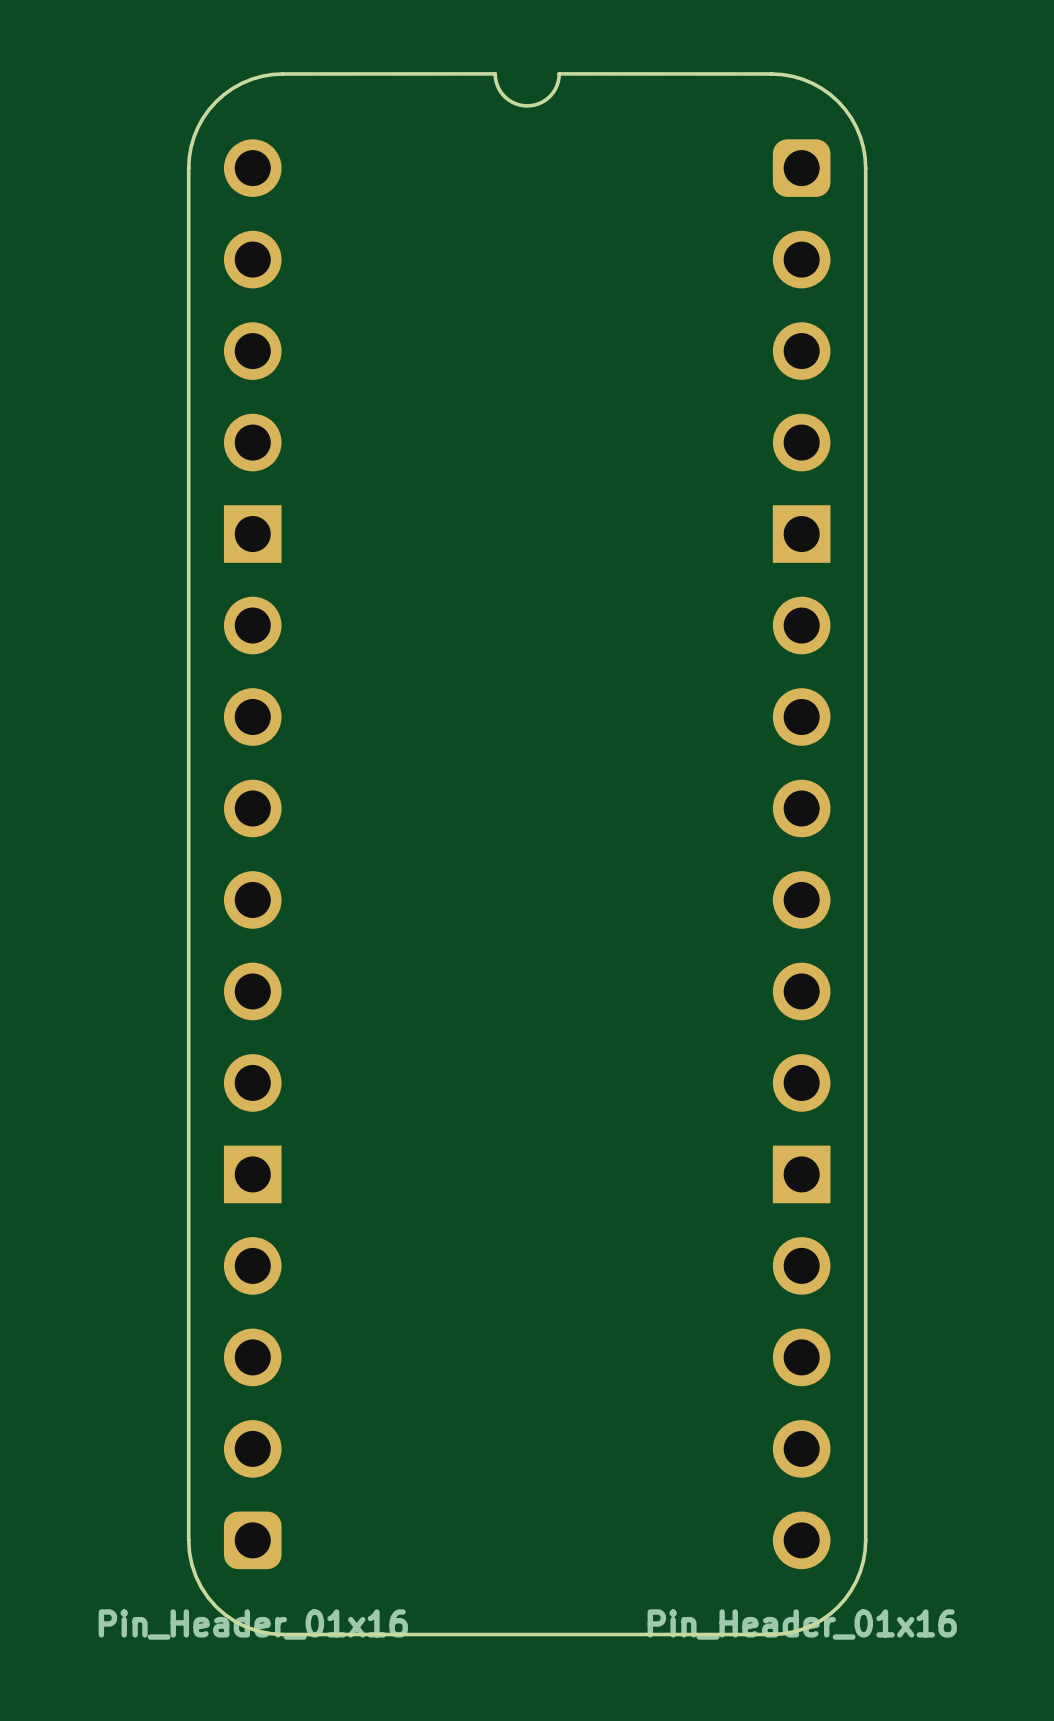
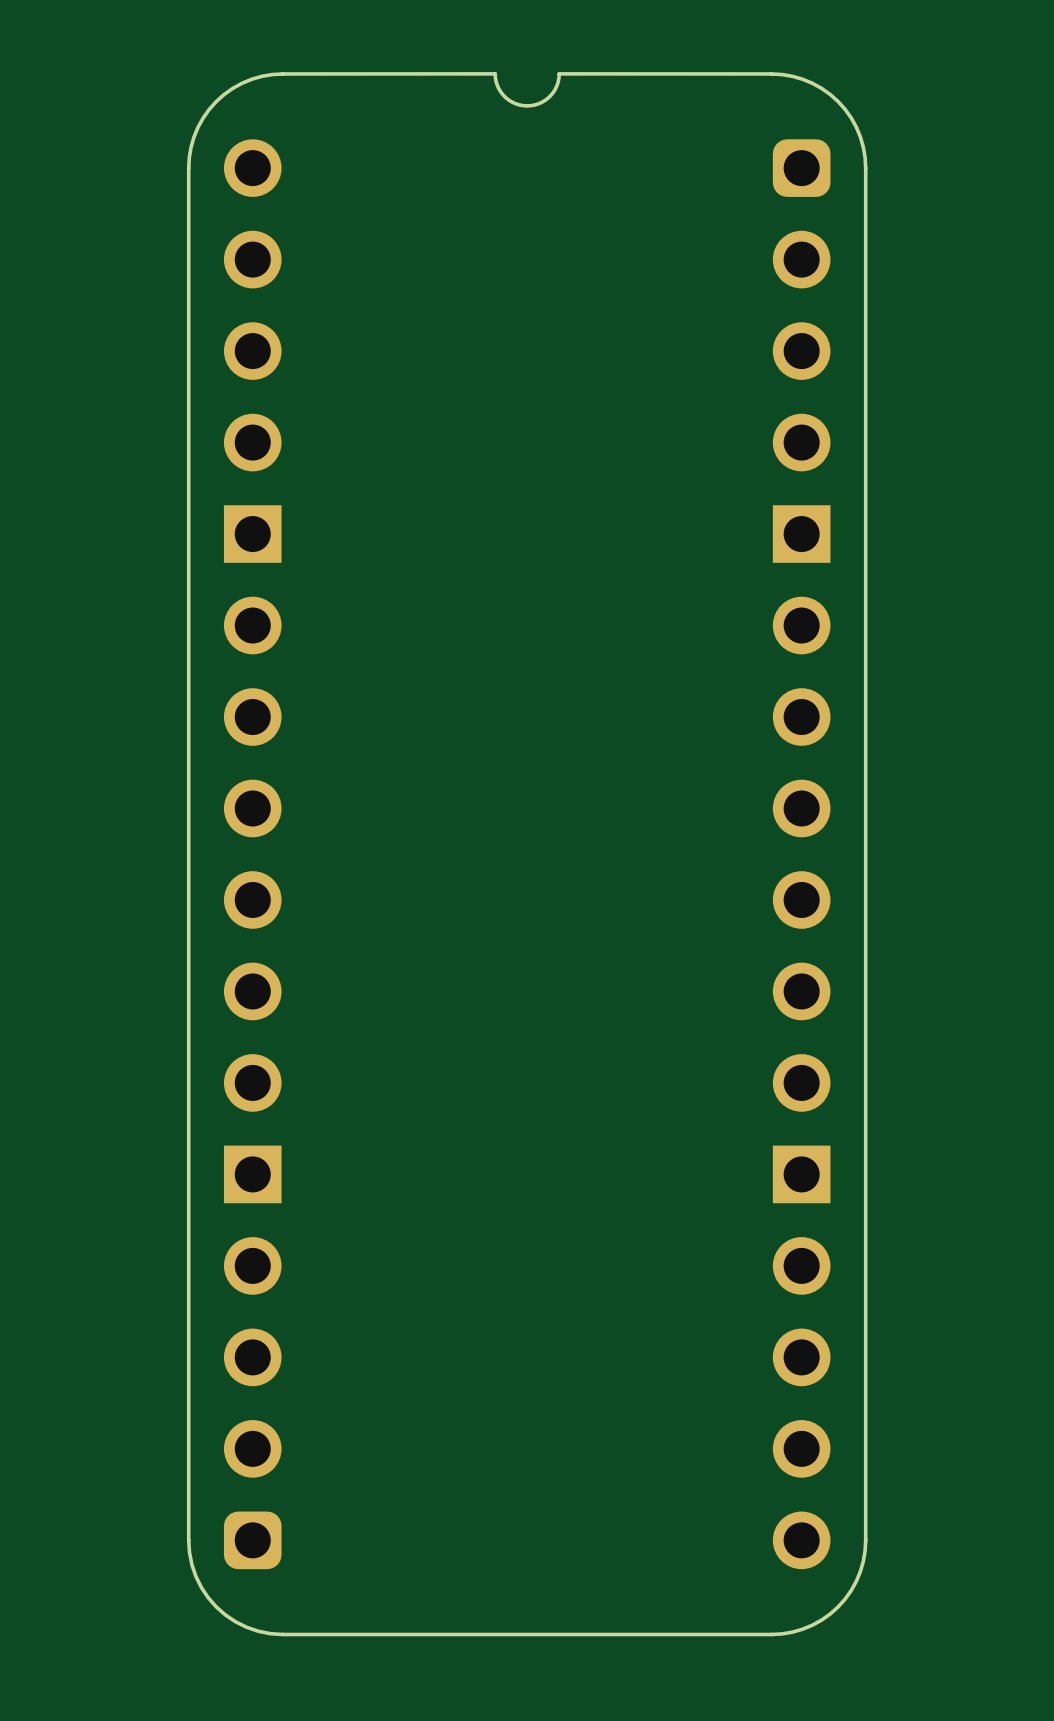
drawing: [98, 1609, 408, 1640] -> none
drawing: [647, 1609, 957, 1640] -> none

